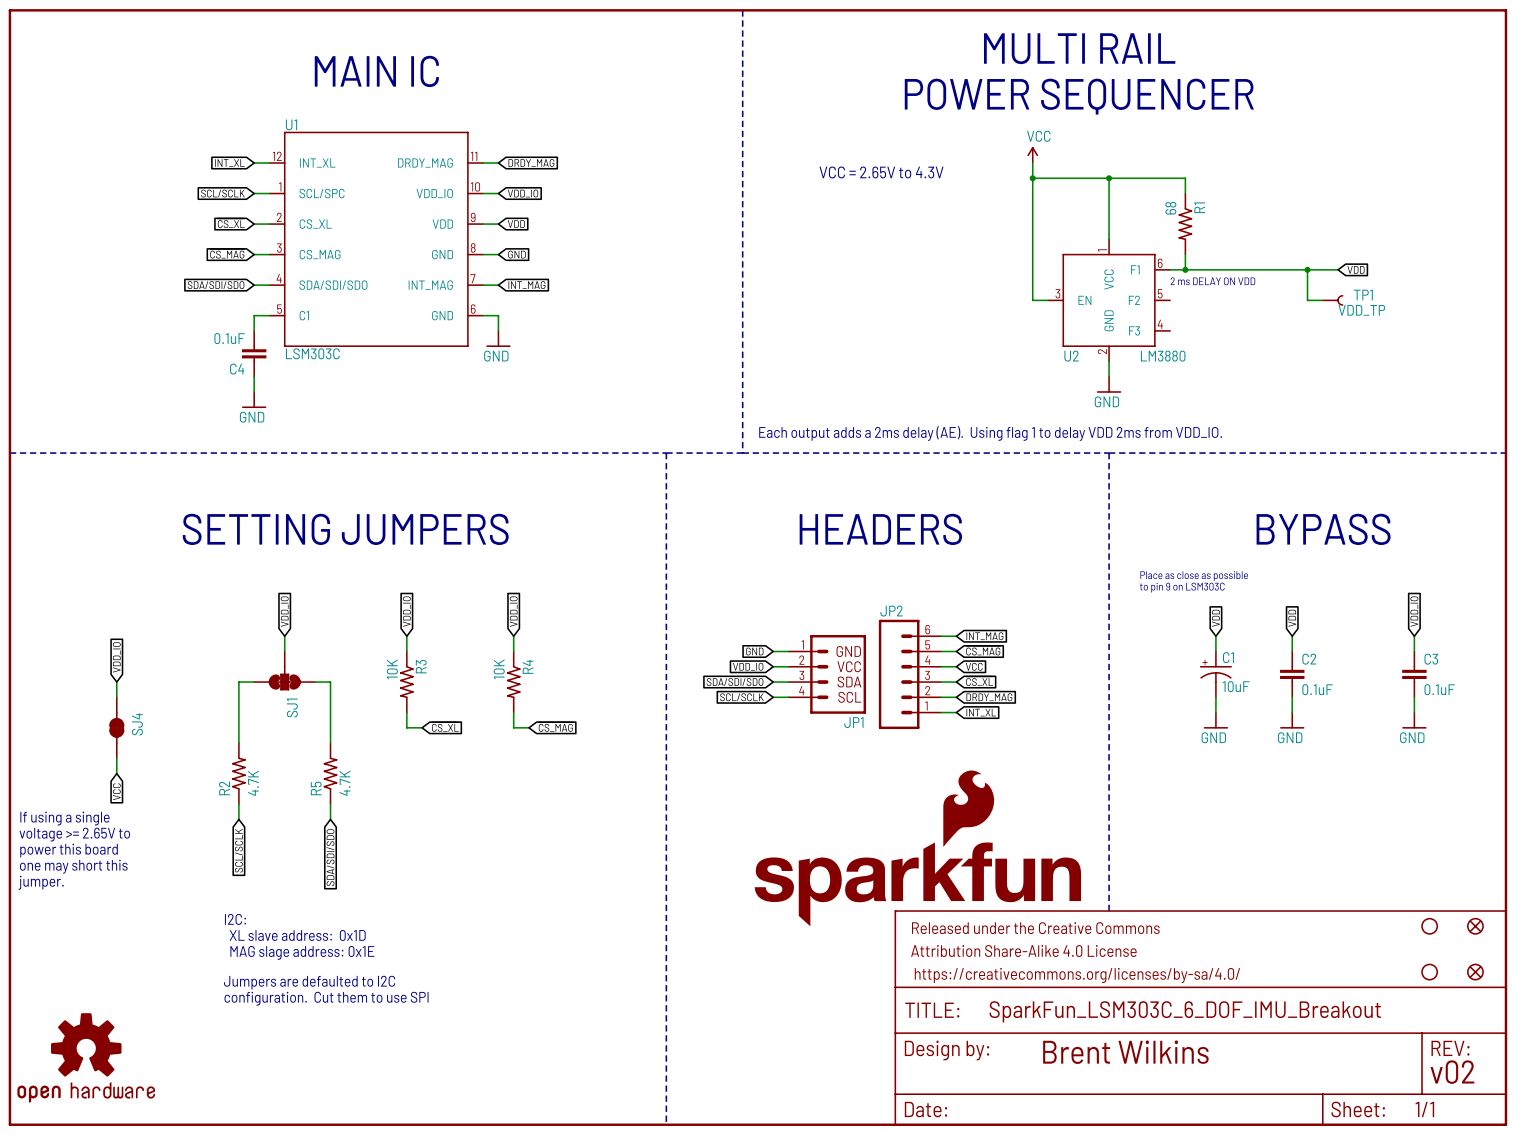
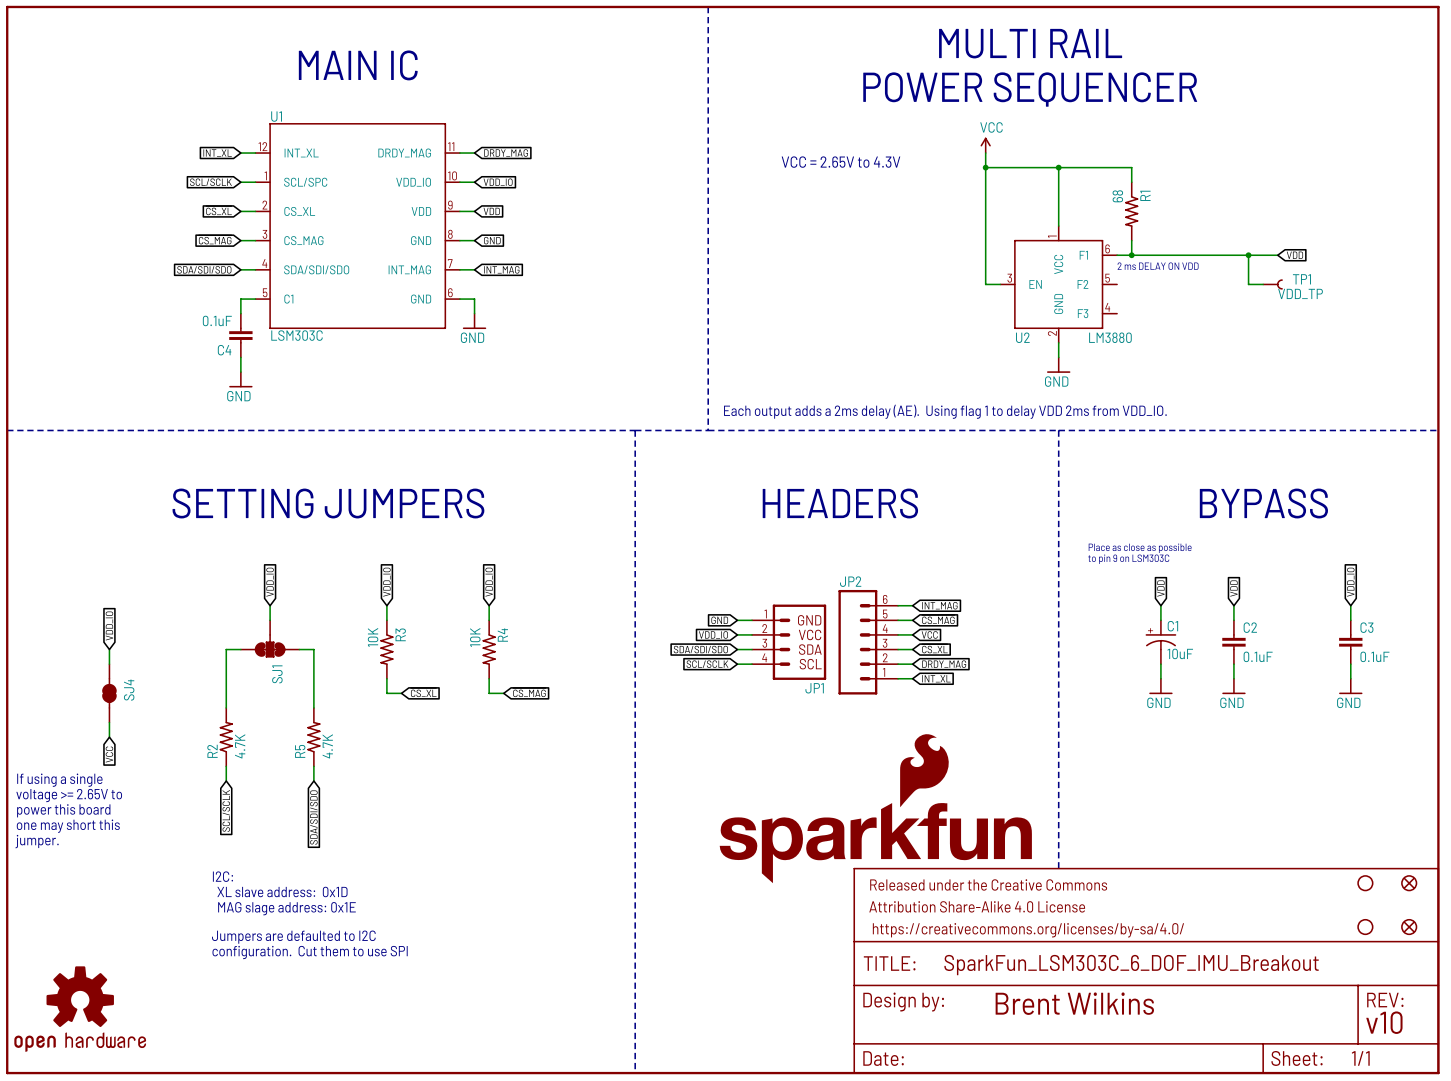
text: v02 (1452, 1072) -> v10 (1384, 1022)

